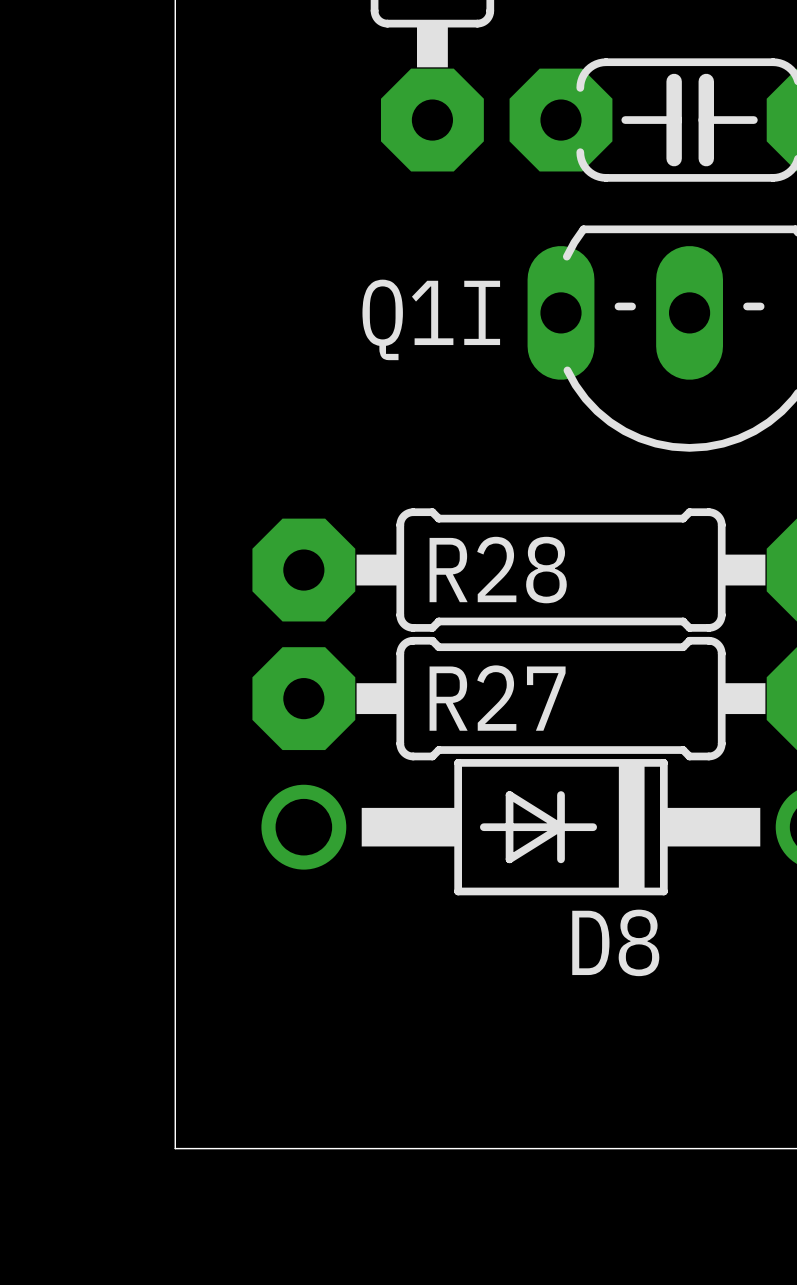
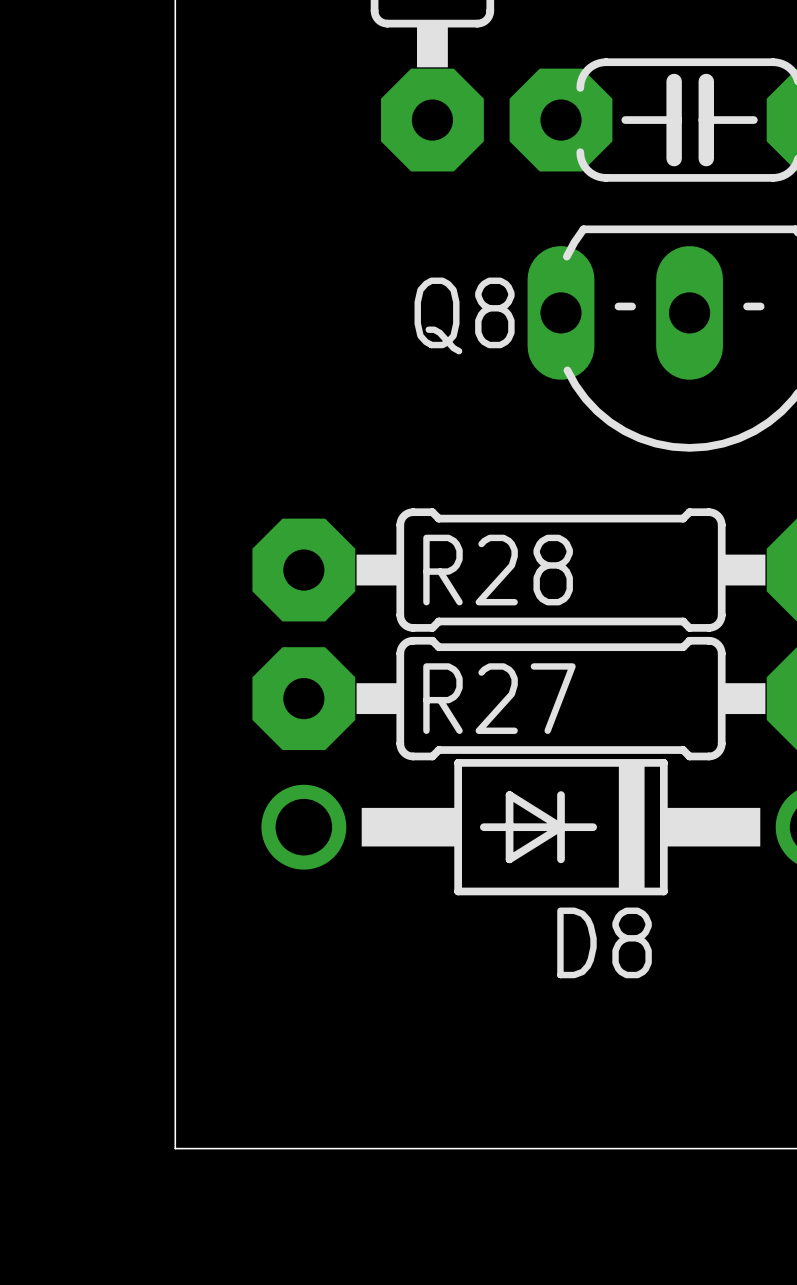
Q1I name: Q1I (431, 319) -> Q8 (464, 315)

